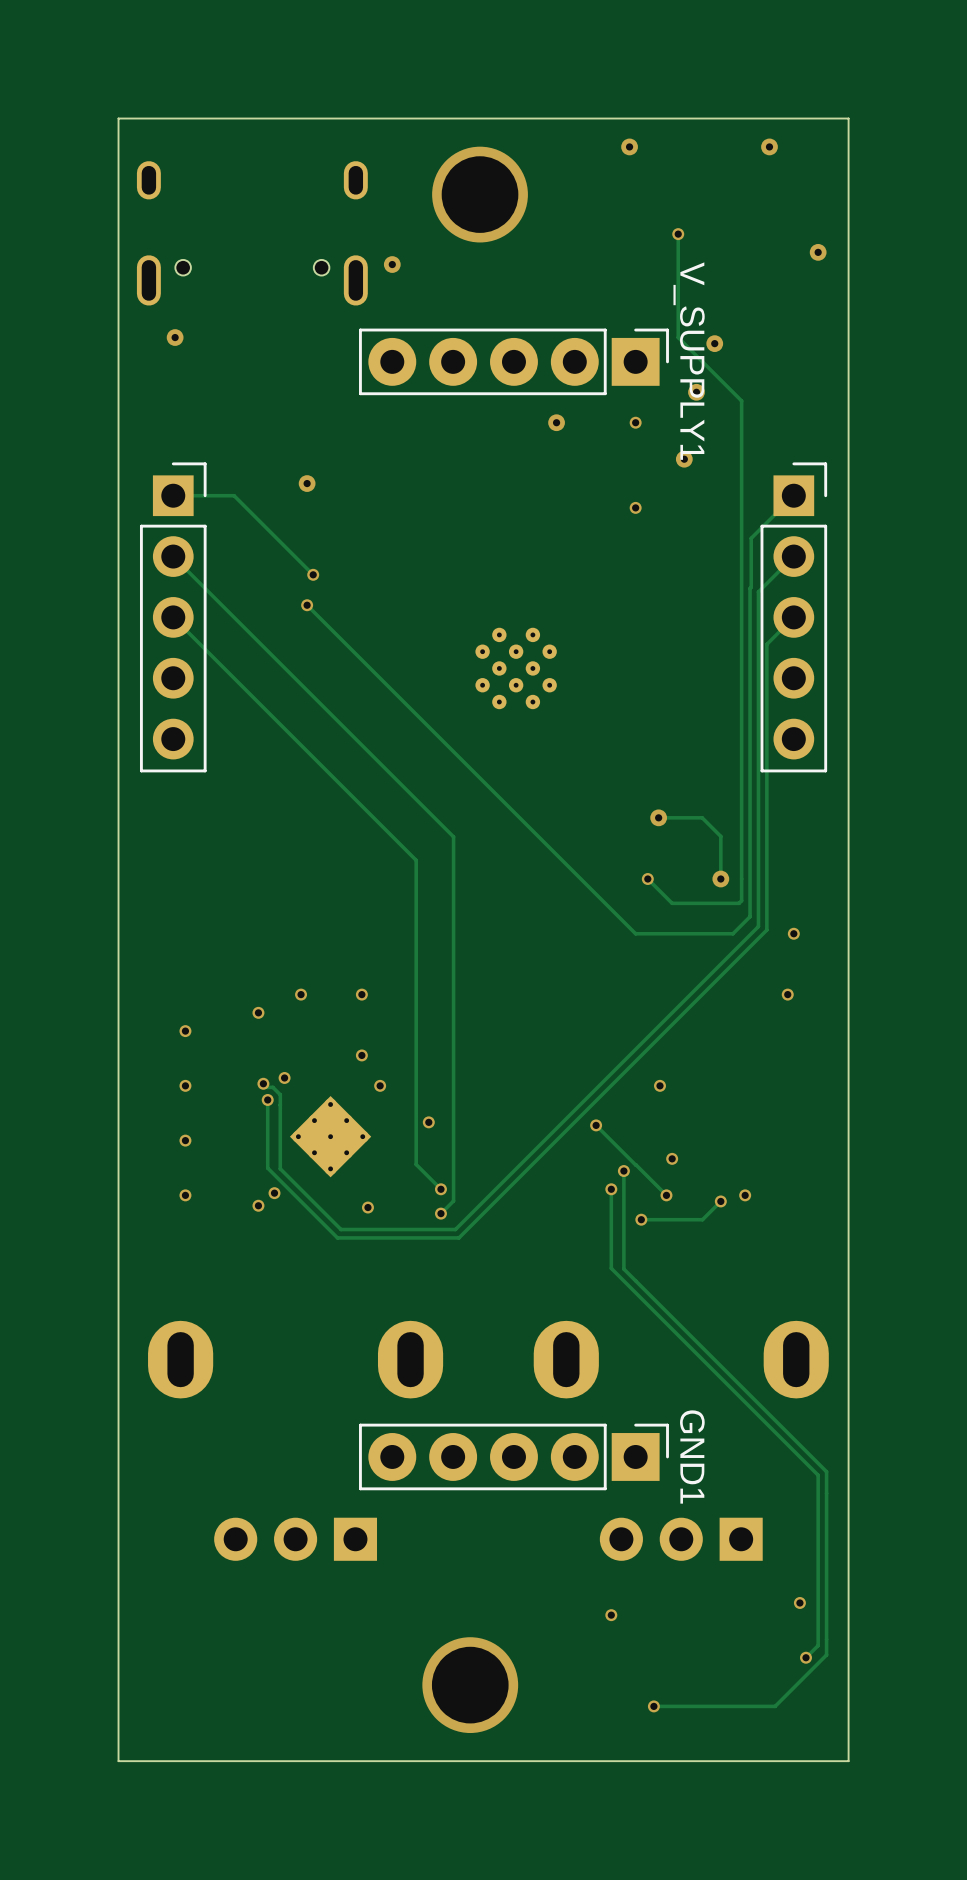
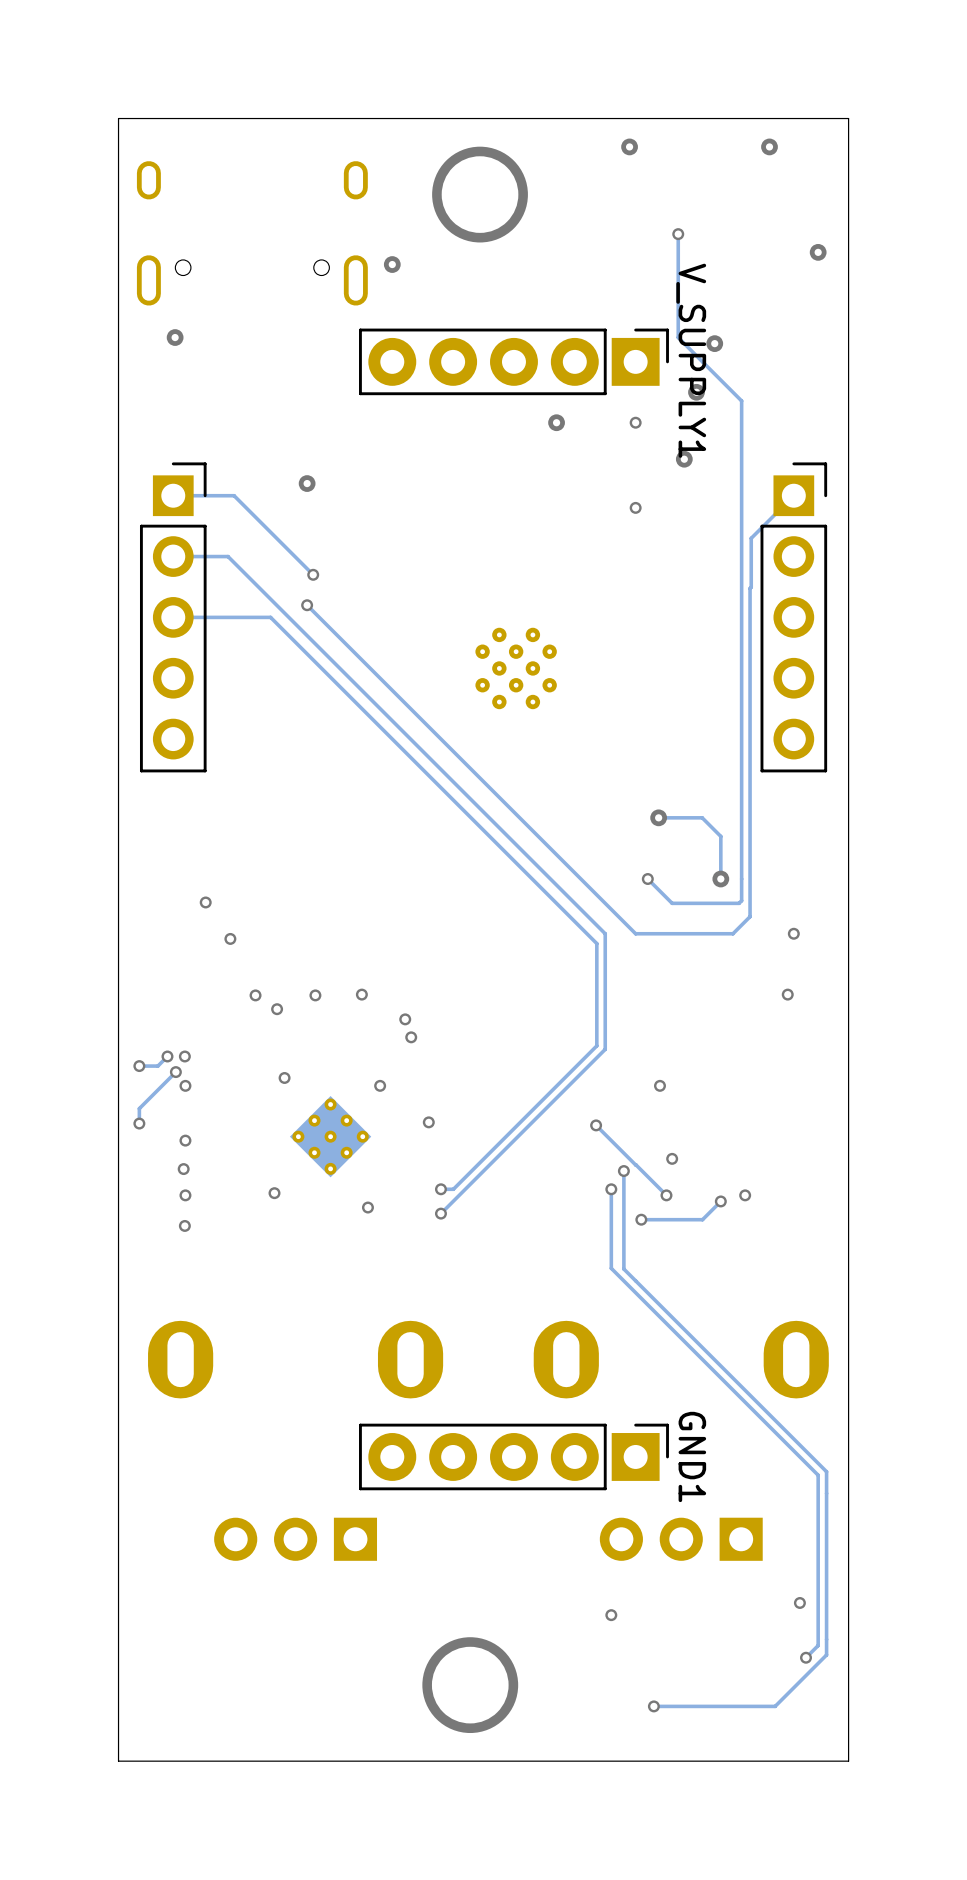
track: (173, 556) (453, 836) (453, 1201) -> (173, 556) (228, 556) (605, 933) (605, 1049) (453, 1201)
track: (793, 556) (758, 591) (758, 926) (455, 1229) (341, 1229) (280, 1168) (280, 1094) (272, 1087) (267, 1087) (263, 1083) -> none
track: (173, 617) (416, 860) (416, 1164) (440, 1189) -> (173, 617) (270, 617) (596, 943) (596, 1045) (453, 1189) (440, 1189)
track: (793, 617) (766, 644) (766, 930) (458, 1237) (337, 1237) (267, 1168) (267, 1099) -> none
via: none -> (205, 902)
via: none -> (230, 938)
via: (301, 994) -> none
via: none -> (255, 995)
via: none -> (315, 995)
via: none -> (277, 1009)
via: (258, 1012) -> none
via: none -> (405, 1019)
via: (185, 1031) -> none
via: none -> (411, 1037)
via: (361, 1055) -> none
track: none -> (167, 1056) (157, 1066) (139, 1066)
via: none -> (167, 1056)
via: none -> (184, 1056)
via: none -> (139, 1066)
track: none -> (175, 1072) (139, 1108) (139, 1123)
via: none -> (175, 1072)
via: (263, 1083) -> none
via: (267, 1099) -> none
via: none -> (139, 1123)
via: none -> (183, 1169)
via: (258, 1205) -> none
via: none -> (184, 1225)

